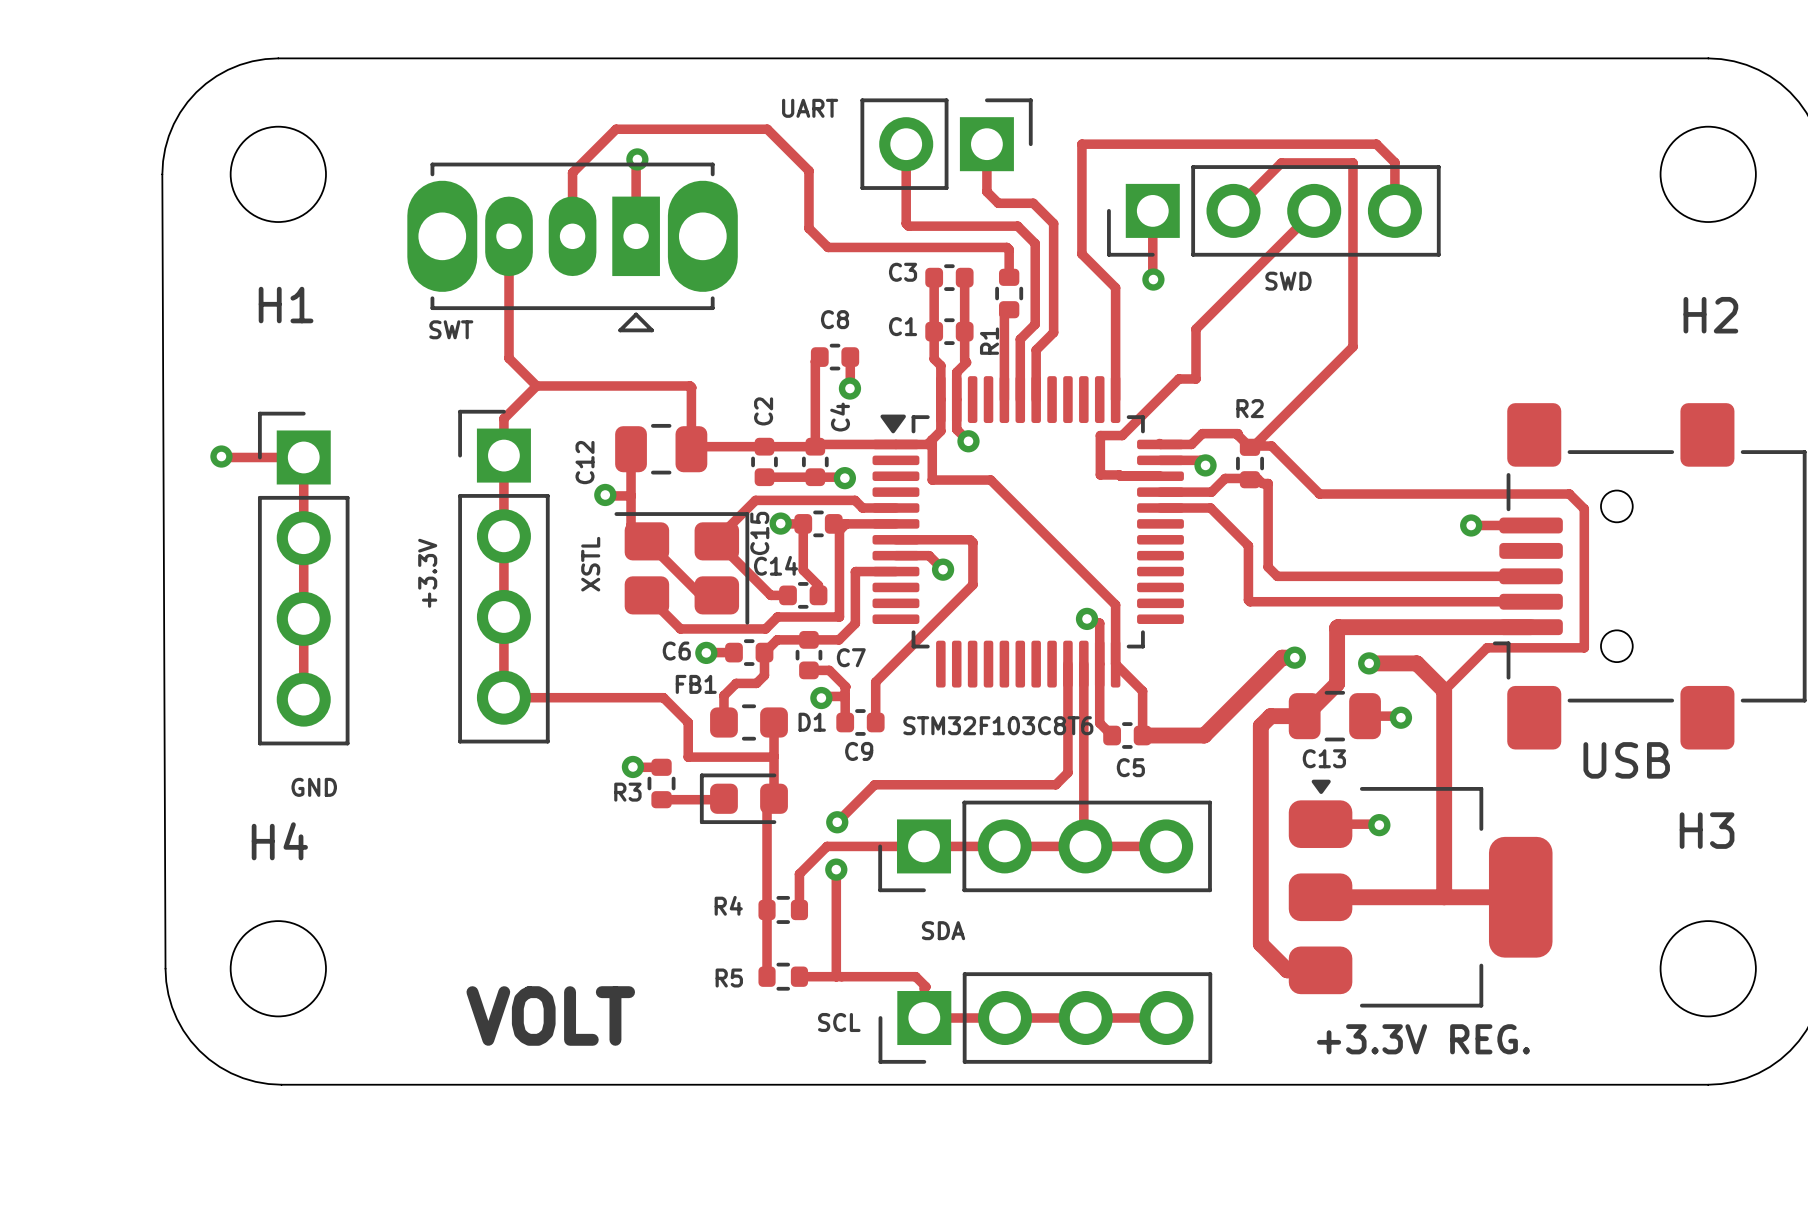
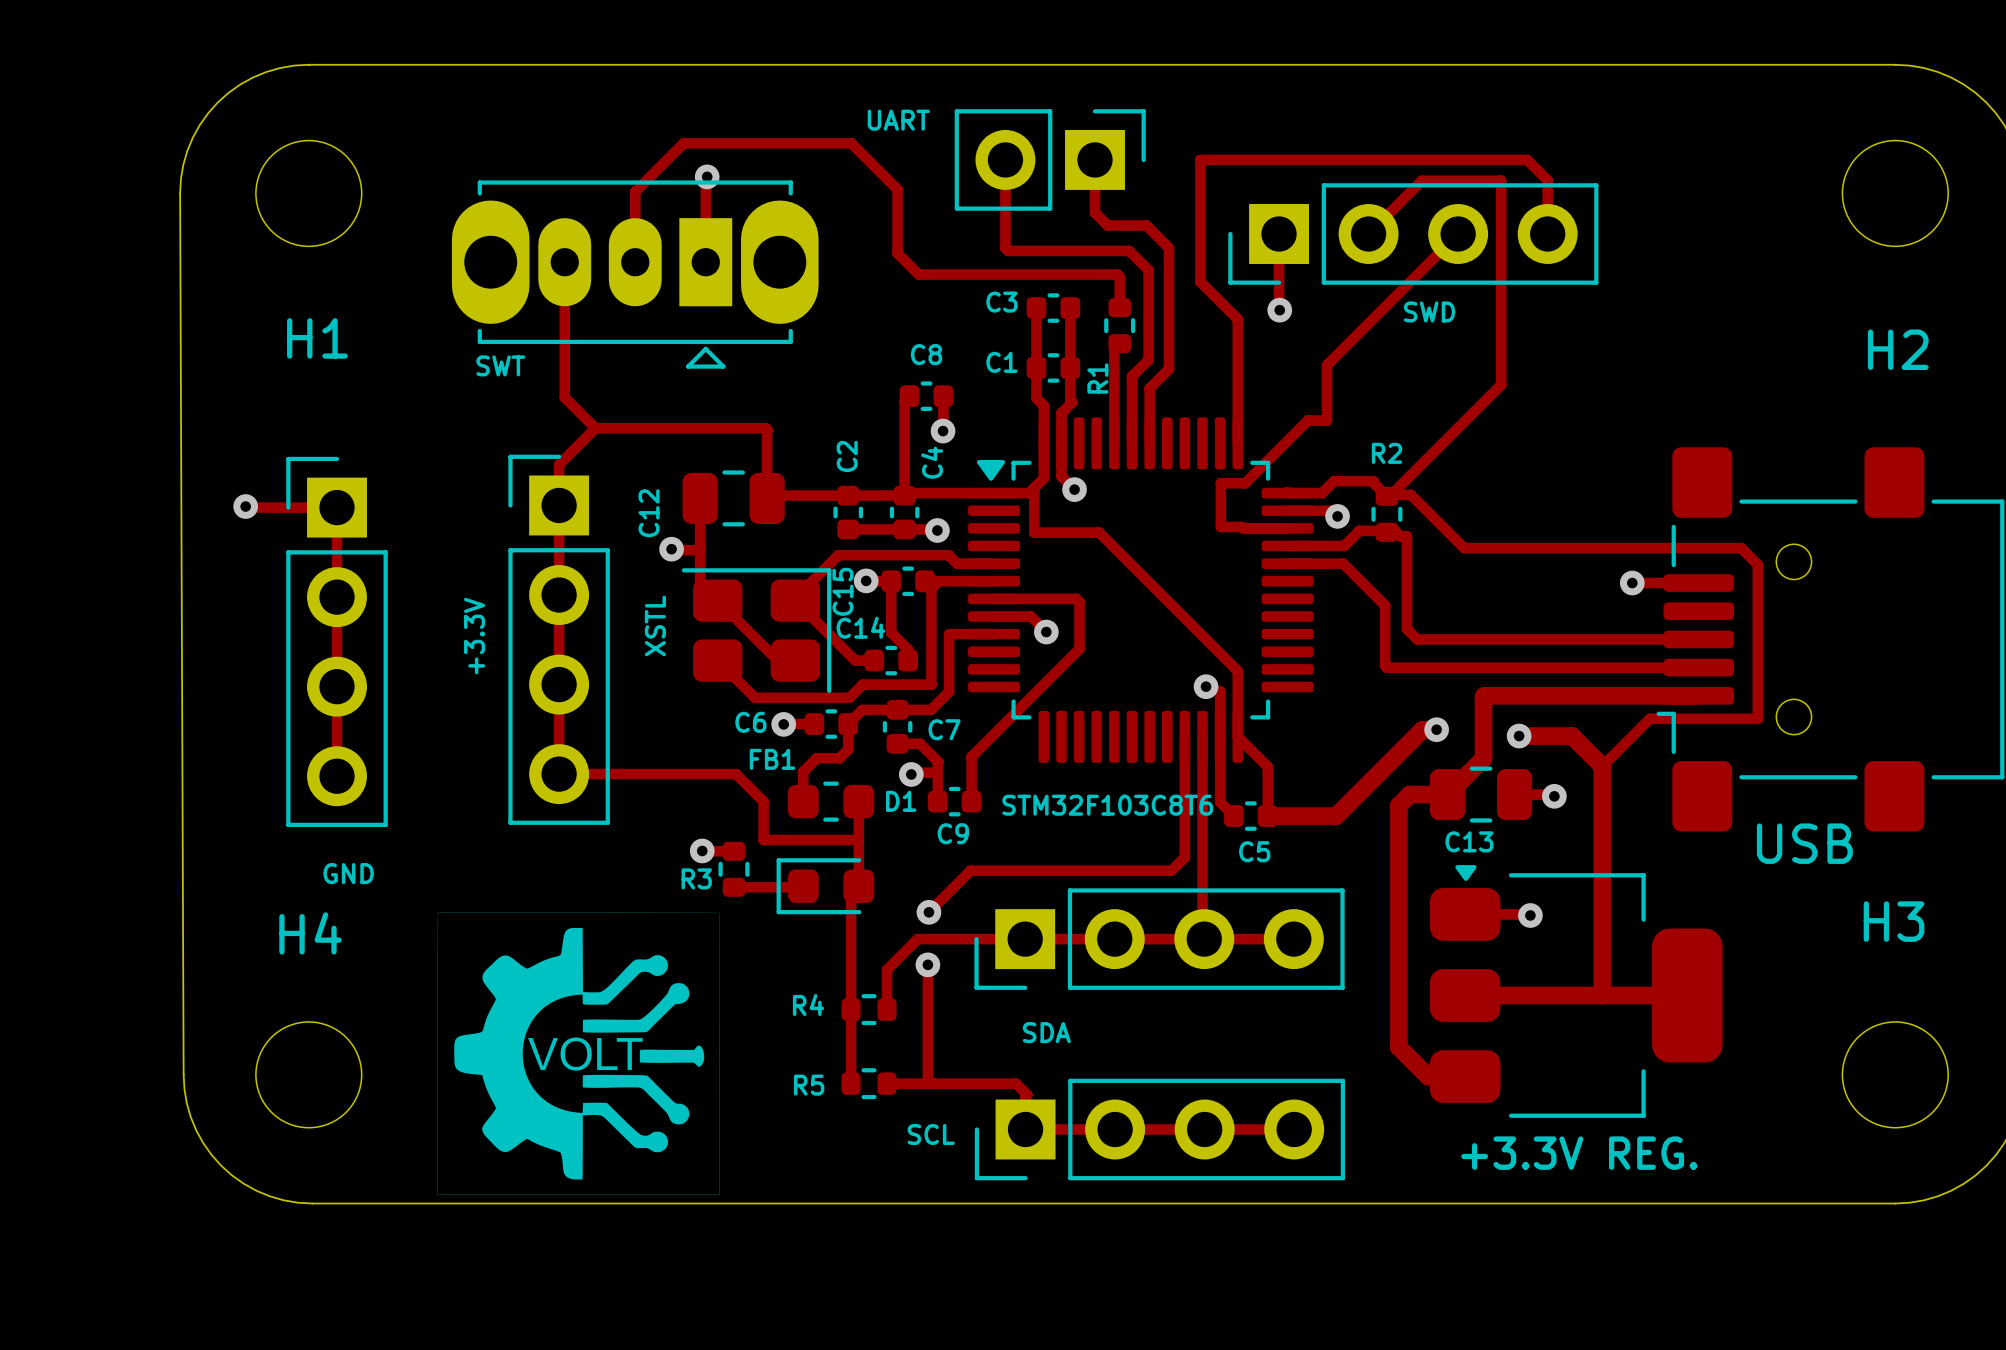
drawing: none -> [437, 912, 720, 1195]
text: VOLT (550, 1015) -> none

